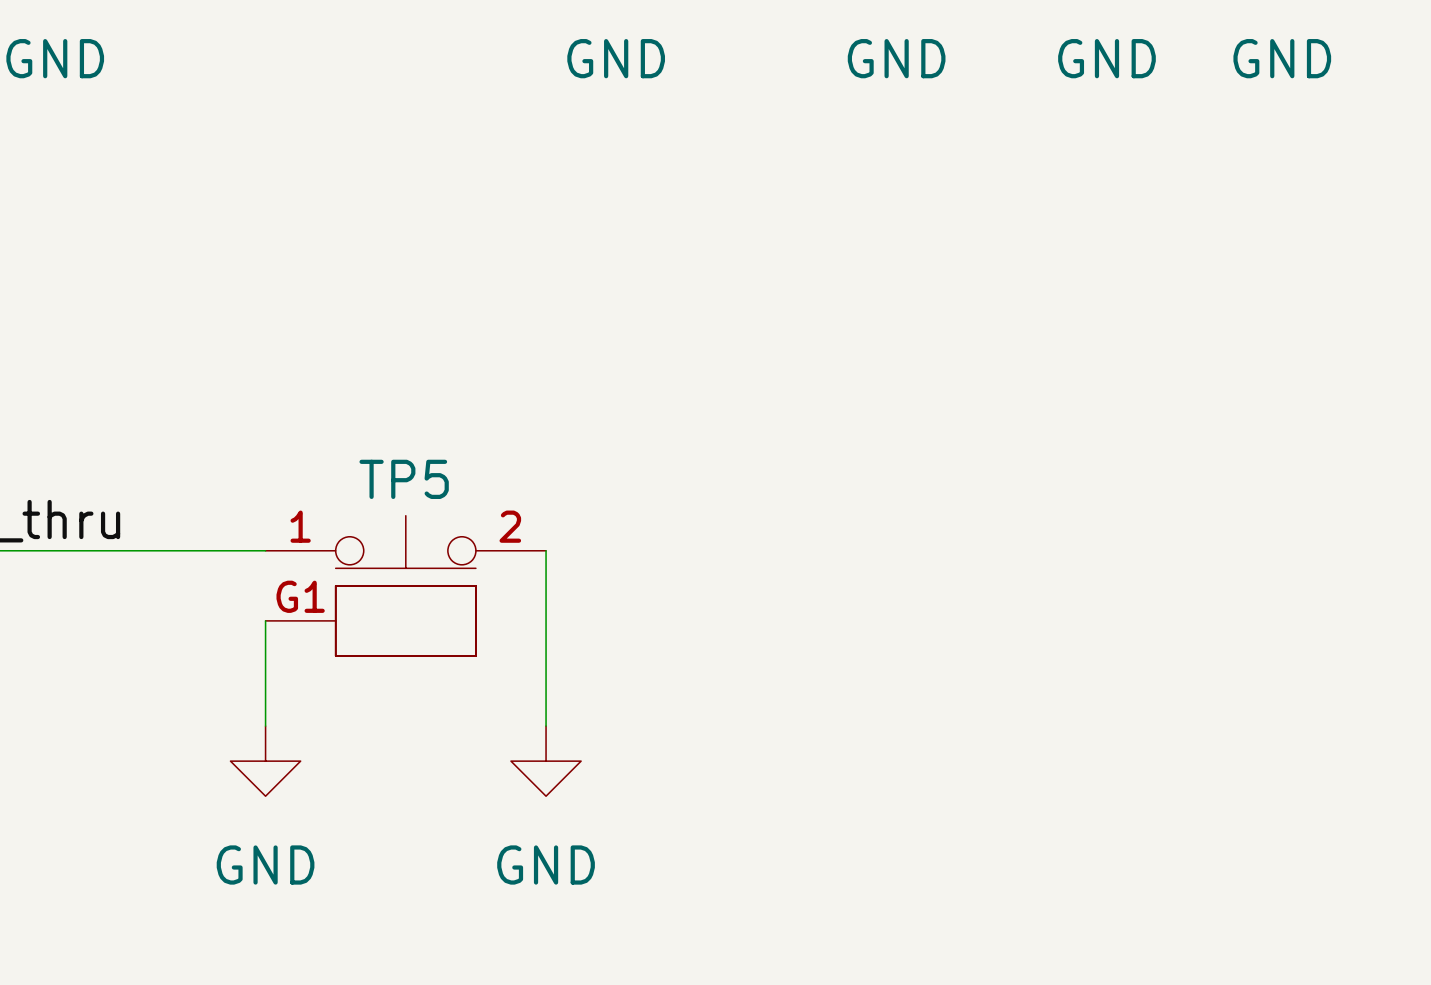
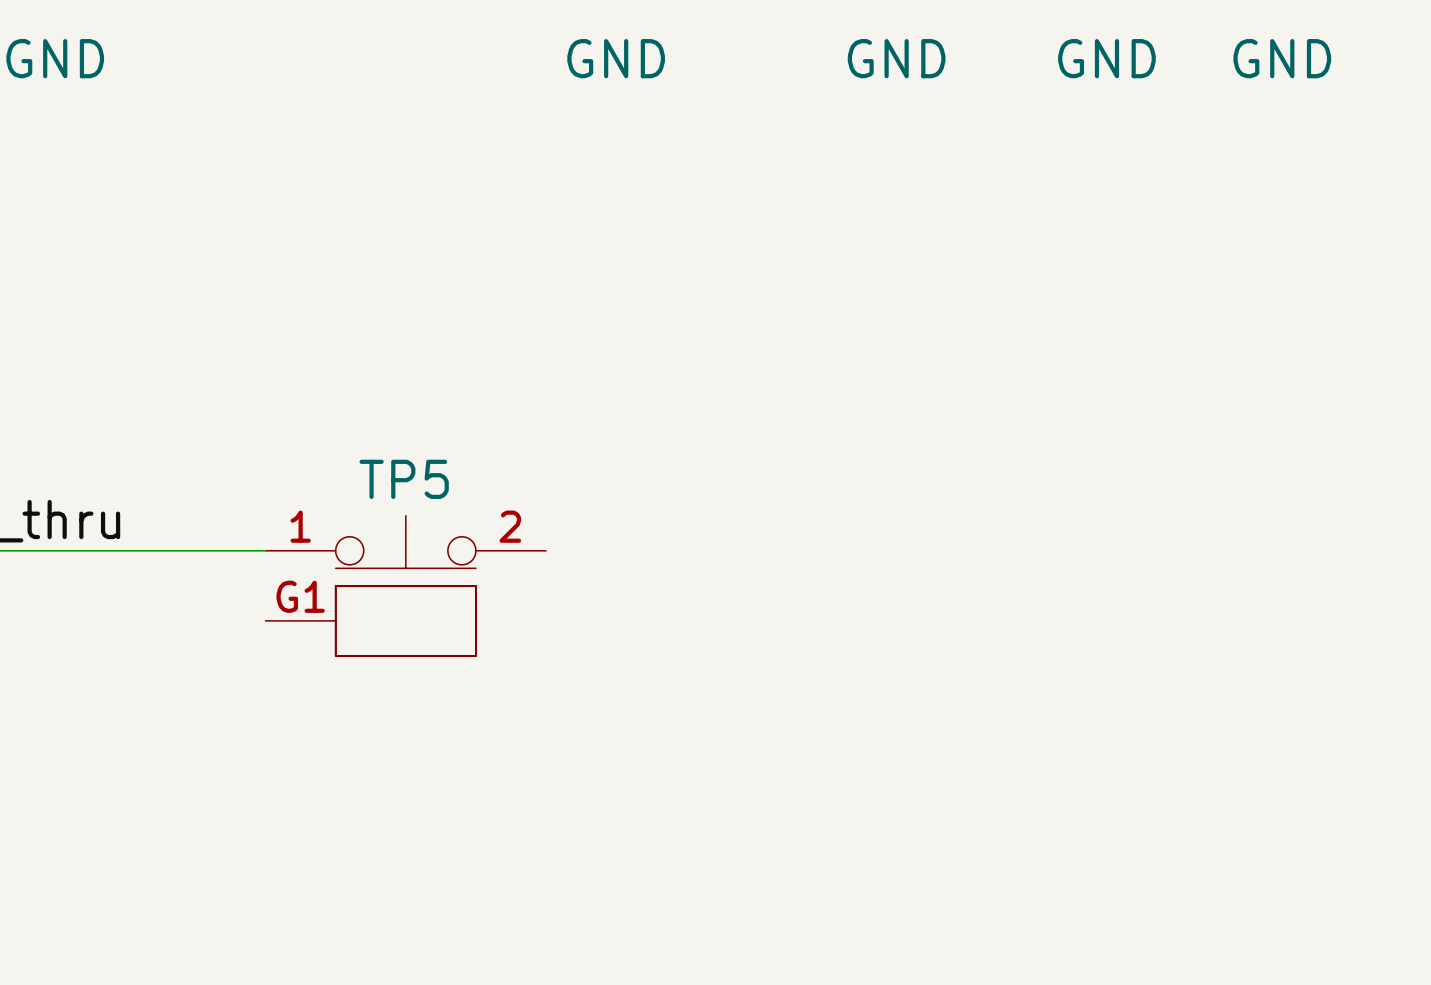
wire: (546, 550) (546, 726) -> none
wire: (265, 620) (265, 726) -> none
power symbol: GND (265, 761) -> none
power symbol: GND (546, 761) -> none

